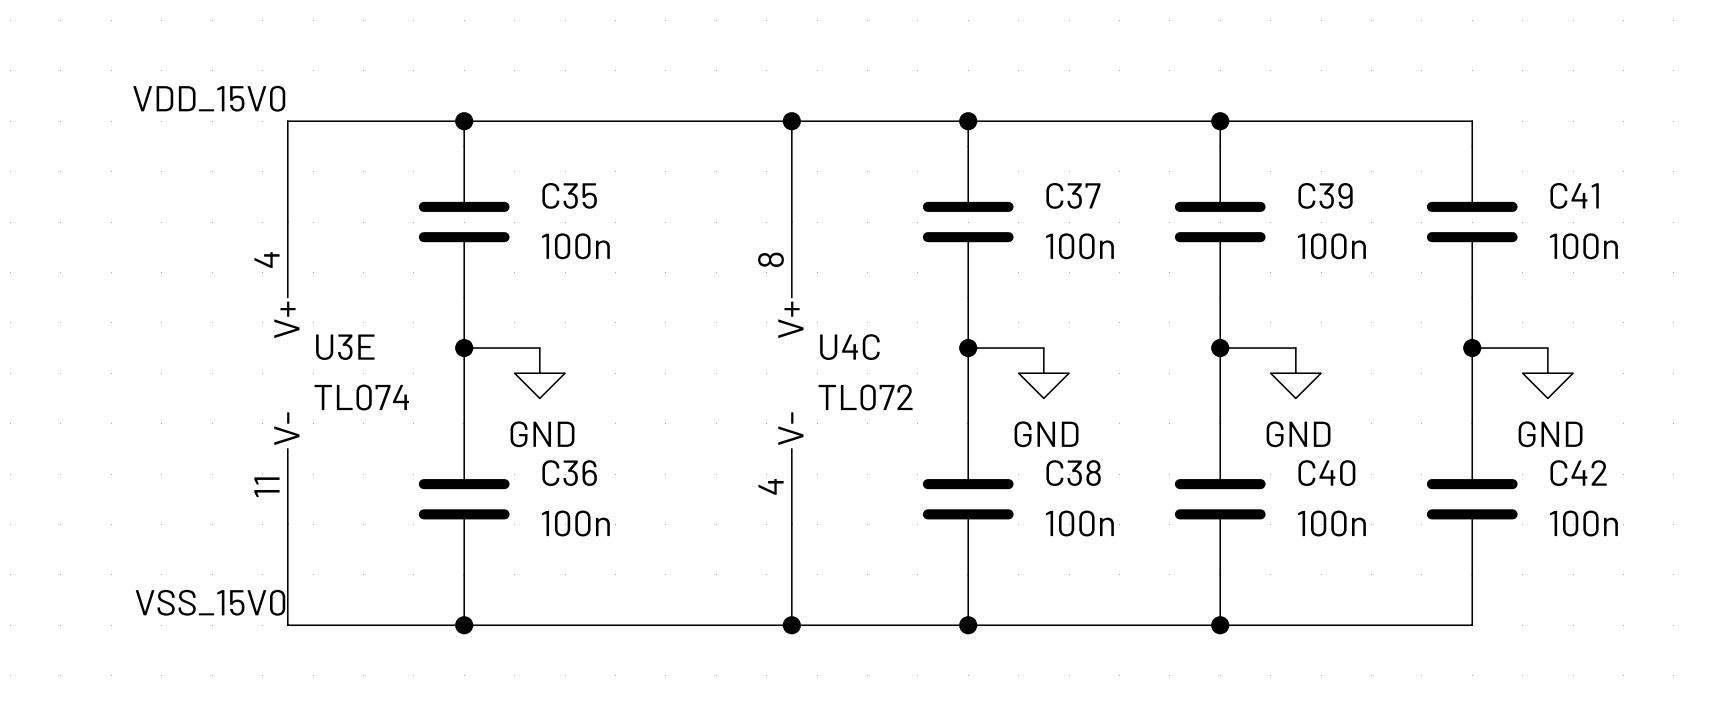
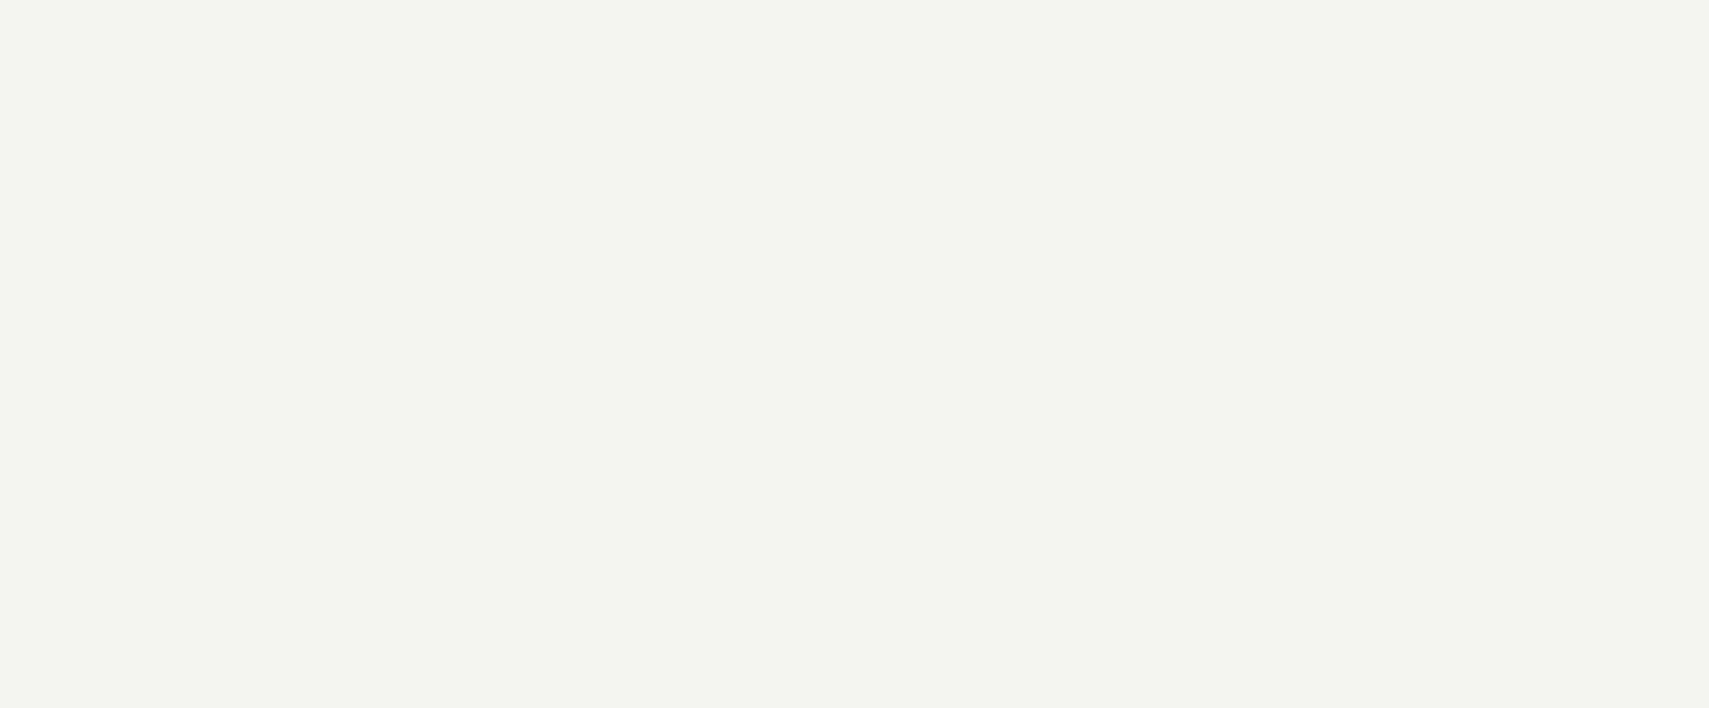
label: VDD_15V0 (209, 98) -> none
wire: (464, 121) (464, 146) -> none
junction: (464, 121) -> none
wire: (791, 121) (791, 222) -> none
junction: (791, 121) -> none
wire: (968, 121) (968, 146) -> none
junction: (968, 121) -> none
wire: (1220, 121) (1220, 146) -> none
junction: (1220, 121) -> none
wire: (1472, 146) (1472, 121) (287, 121) (287, 222) -> none
C35: 100n (464, 222) -> none
C37: 100n (968, 222) -> none
C39: 100n (1220, 222) -> none
C41: 100n (1472, 222) -> none
wire: (464, 297) (464, 423) -> none
wire: (968, 297) (968, 423) -> none
wire: (1220, 297) (1220, 423) -> none
wire: (1472, 297) (1472, 423) -> none
wire: (464, 348) (539, 348) -> none
junction: (464, 348) -> none
wire: (968, 348) (1043, 348) -> none
junction: (968, 348) -> none
wire: (1220, 348) (1295, 348) -> none
junction: (1220, 348) -> none
wire: (1472, 348) (1547, 348) -> none
junction: (1472, 348) -> none
U3E: TL074 (287, 373) -> none
power symbol: GND (539, 373) -> none
U4C: TL072 (791, 373) -> none
power symbol: GND (1043, 373) -> none
power symbol: GND (1295, 373) -> none
power symbol: GND (1547, 373) -> none
C36: 100n (464, 499) -> none
C38: 100n (968, 499) -> none
C40: 100n (1220, 499) -> none
C42: 100n (1472, 499) -> none
wire: (287, 524) (287, 625) (1472, 625) (1472, 574) -> none
wire: (791, 524) (791, 625) -> none
wire: (464, 574) (464, 625) -> none
wire: (968, 574) (968, 625) -> none
wire: (1220, 574) (1220, 625) -> none
label: VSS_15V0 (210, 602) -> none
junction: (464, 625) -> none
junction: (791, 625) -> none
junction: (968, 625) -> none
junction: (1220, 625) -> none

